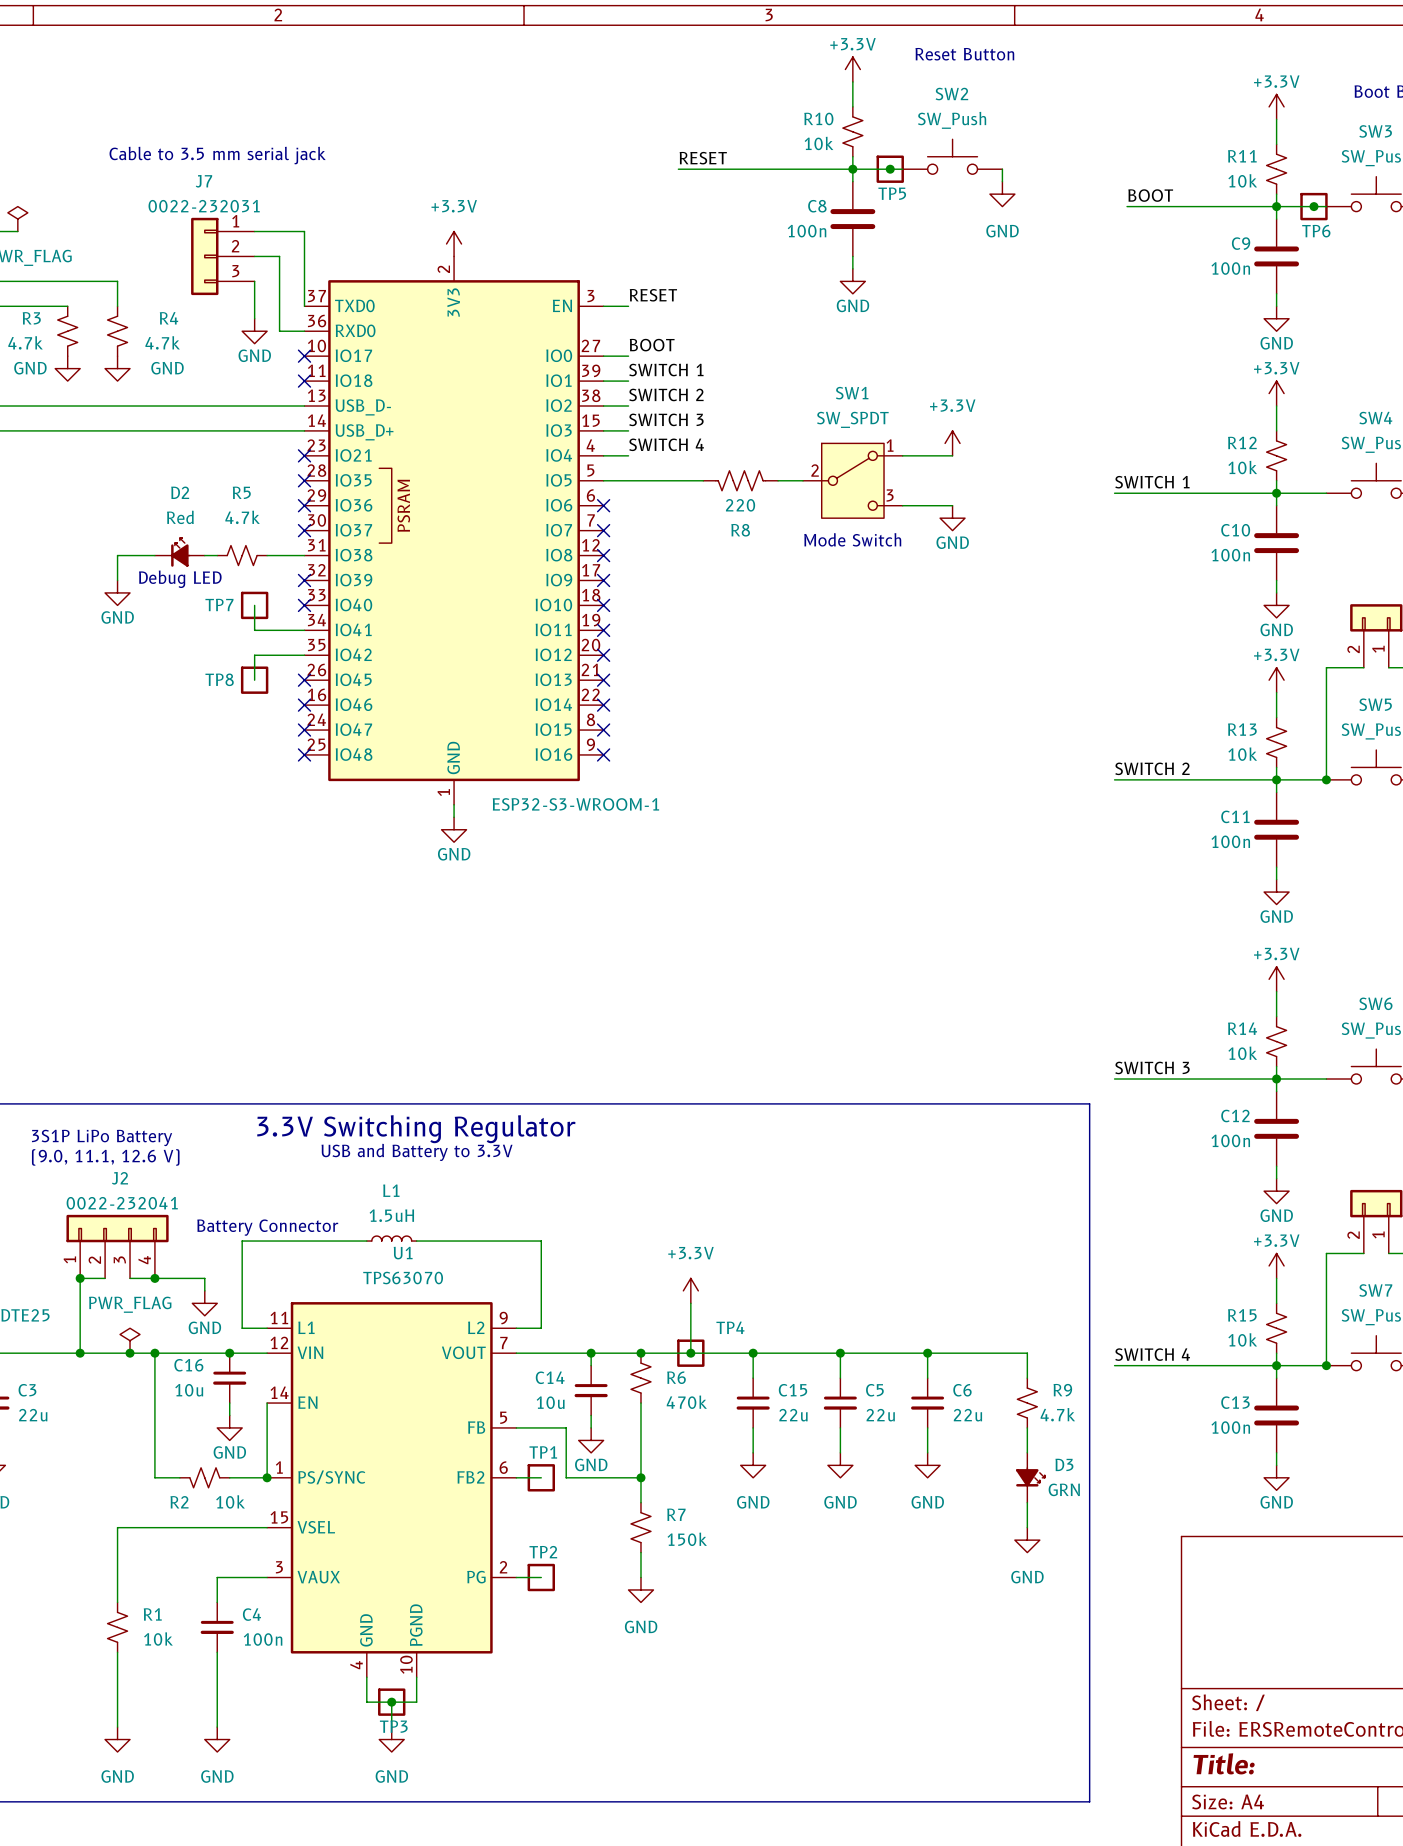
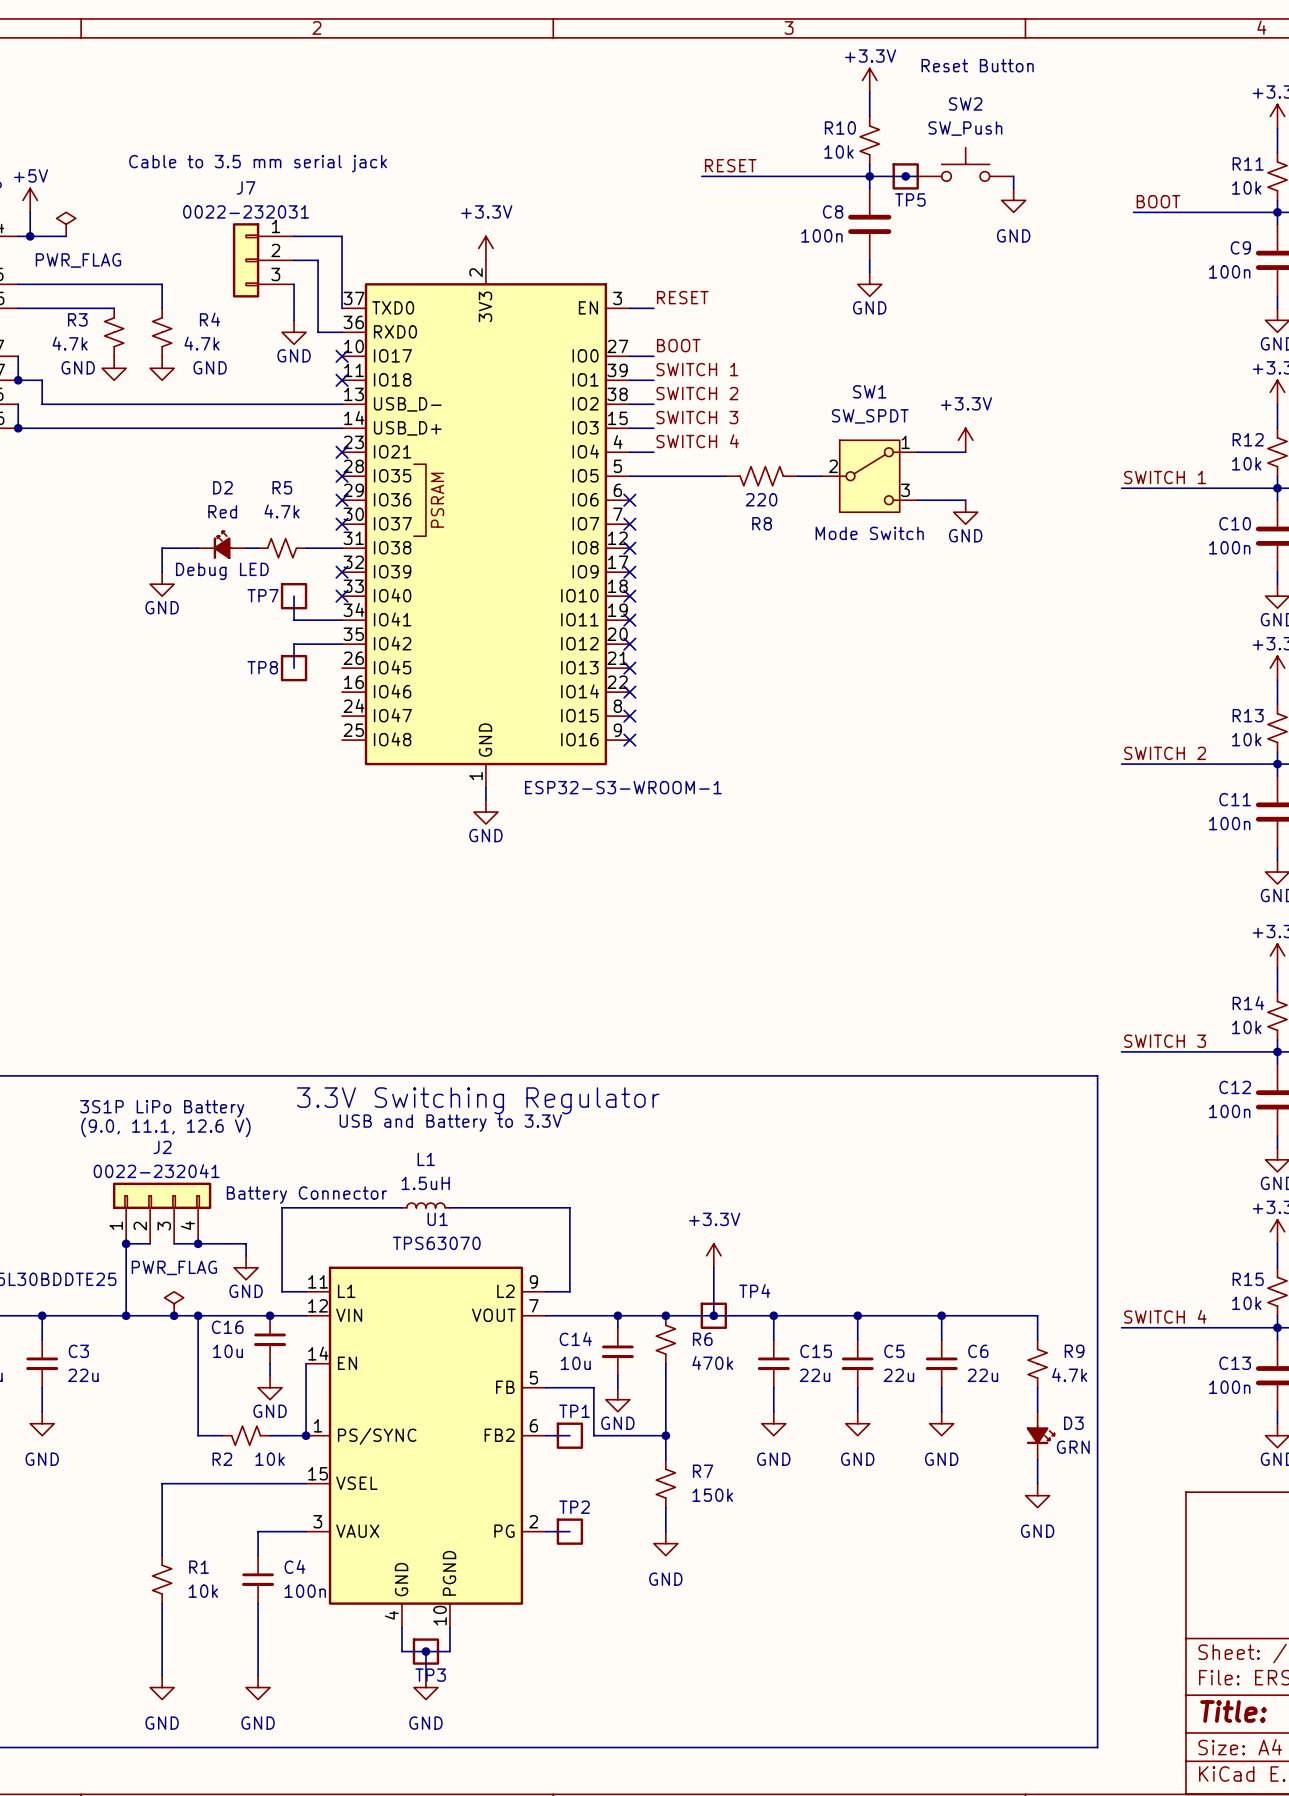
no-connect mark: (304, 680) -> none
no-connect mark: (304, 705) -> none
no-connect mark: (304, 730) -> none
no-connect mark: (304, 754) -> none

